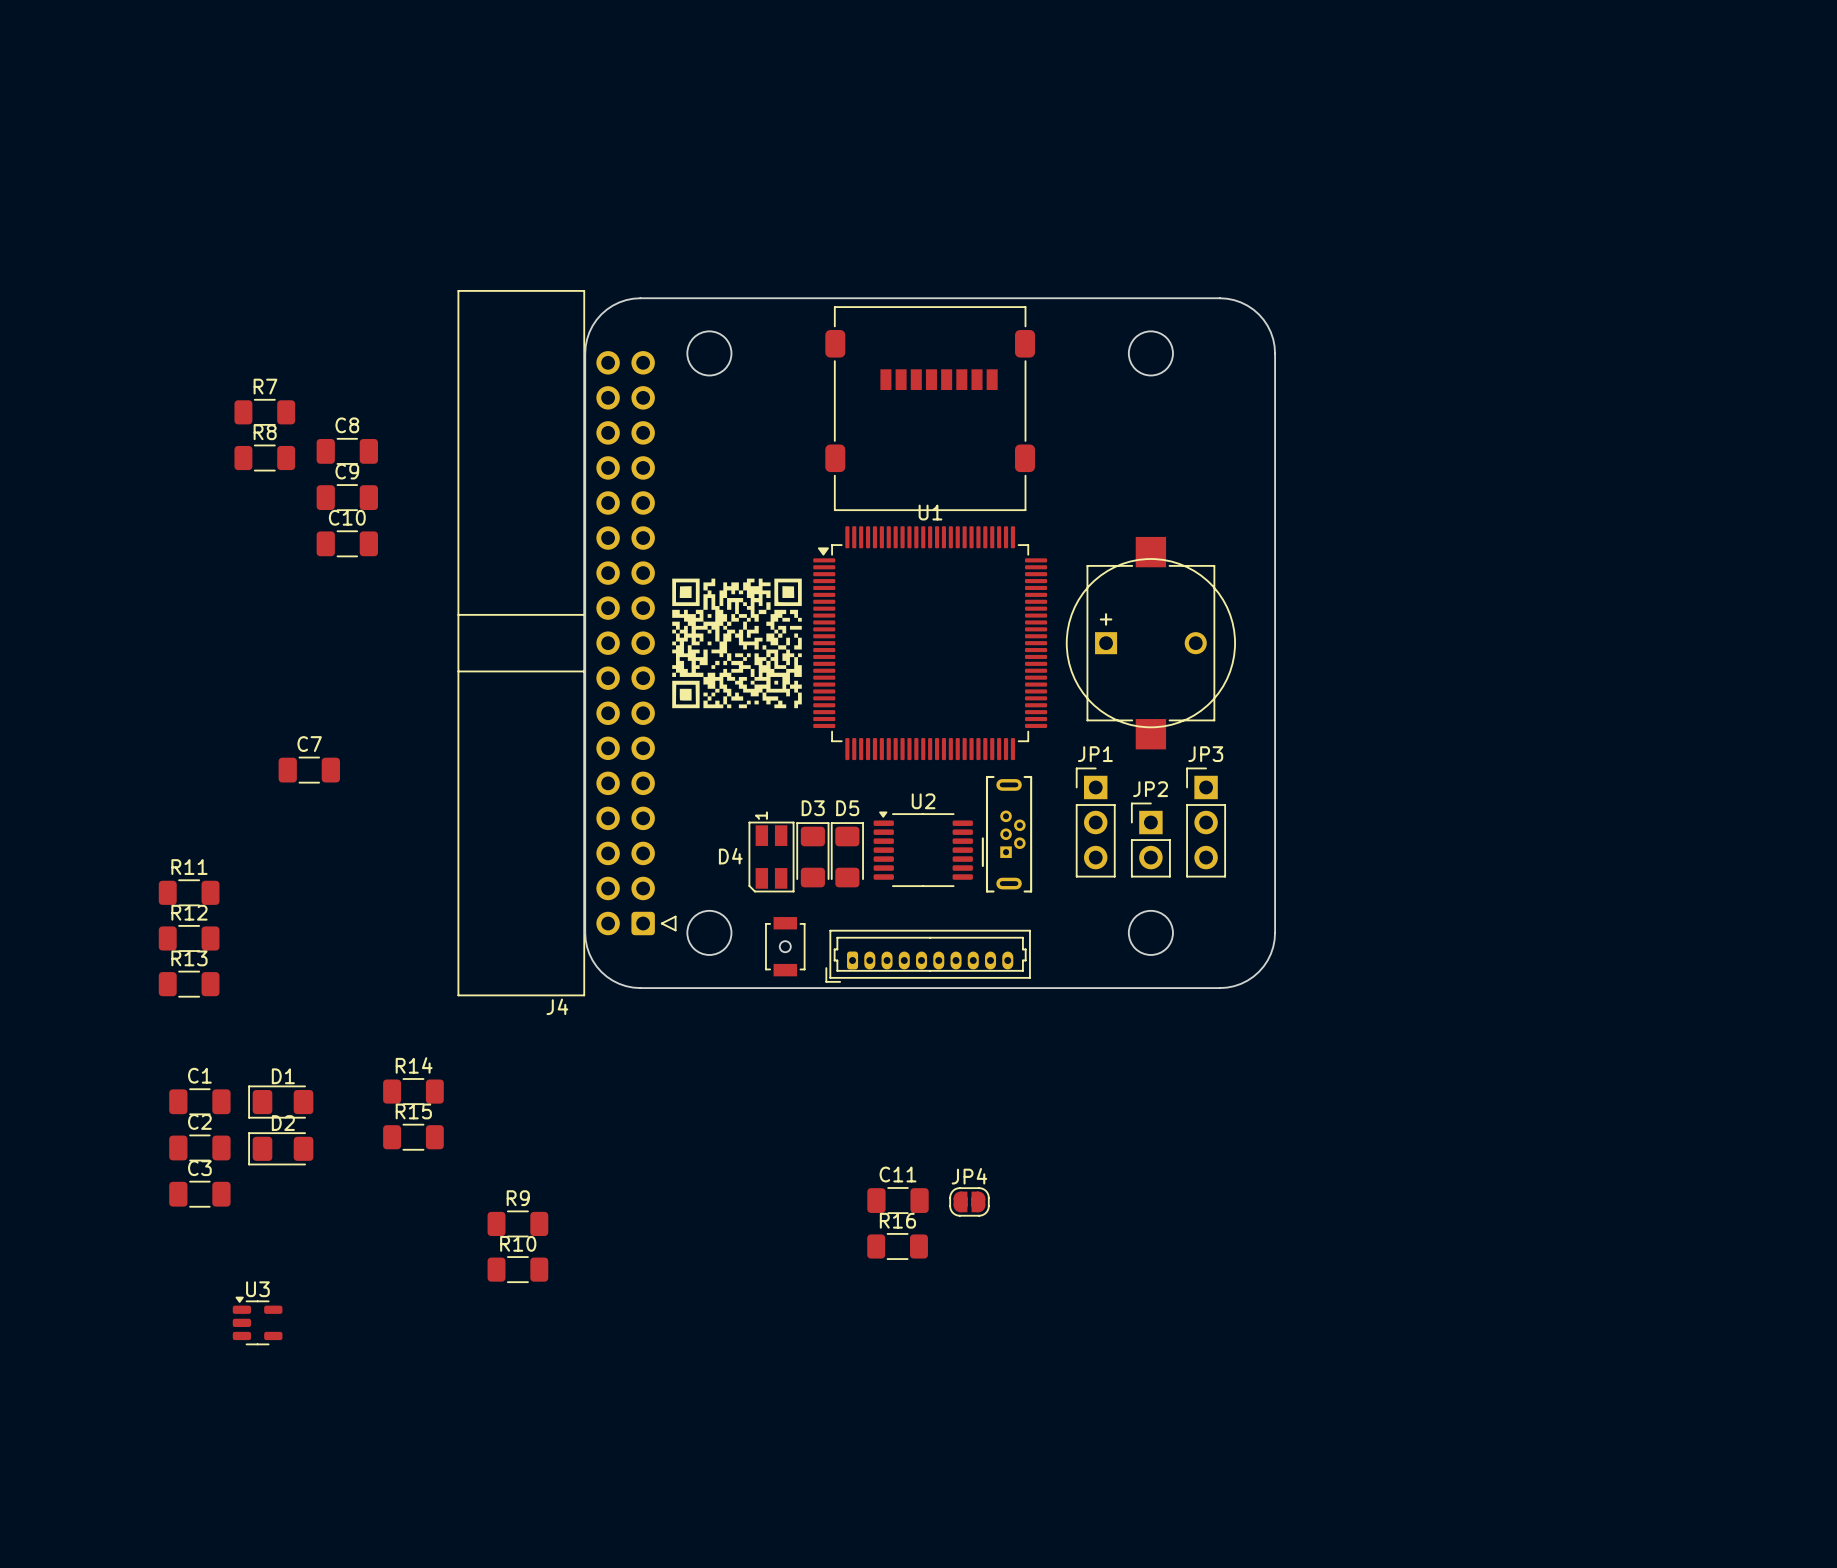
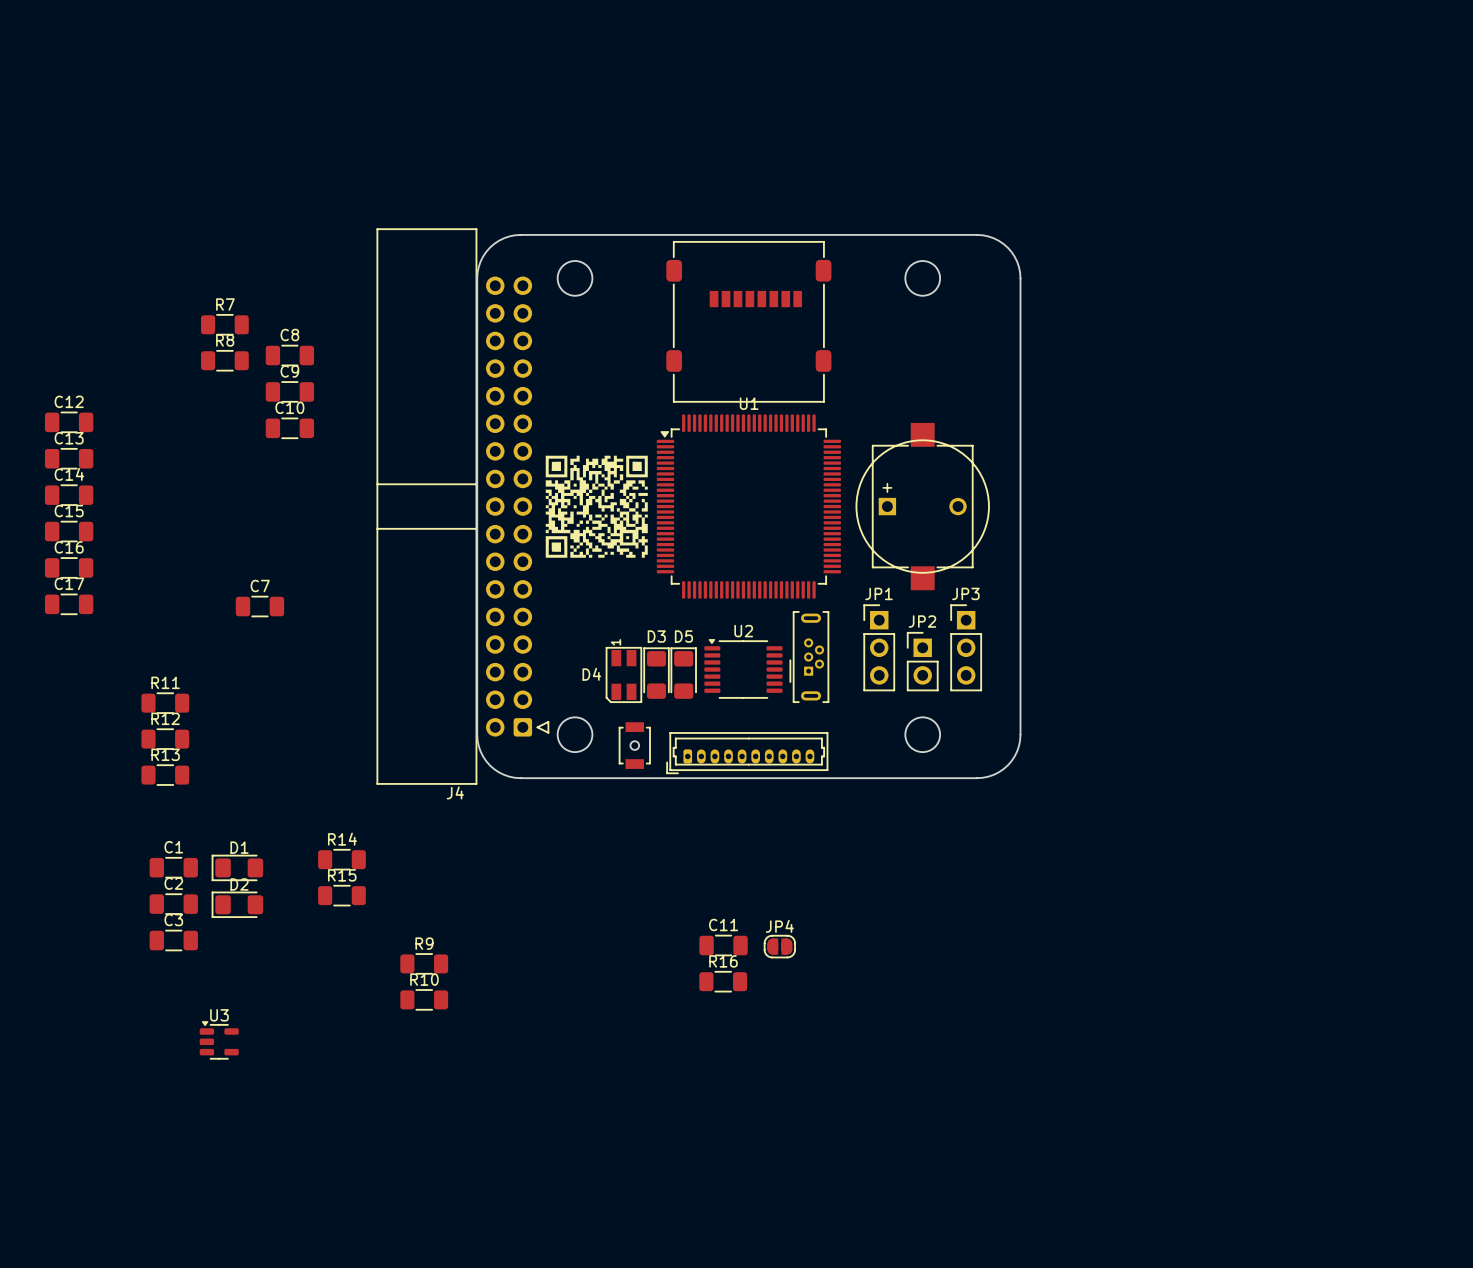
C12: none -> (69, 422)
C13: none -> (69, 458)
C14: none -> (69, 495)
C15: none -> (69, 531)
C16: none -> (69, 567)
C17: none -> (69, 604)

